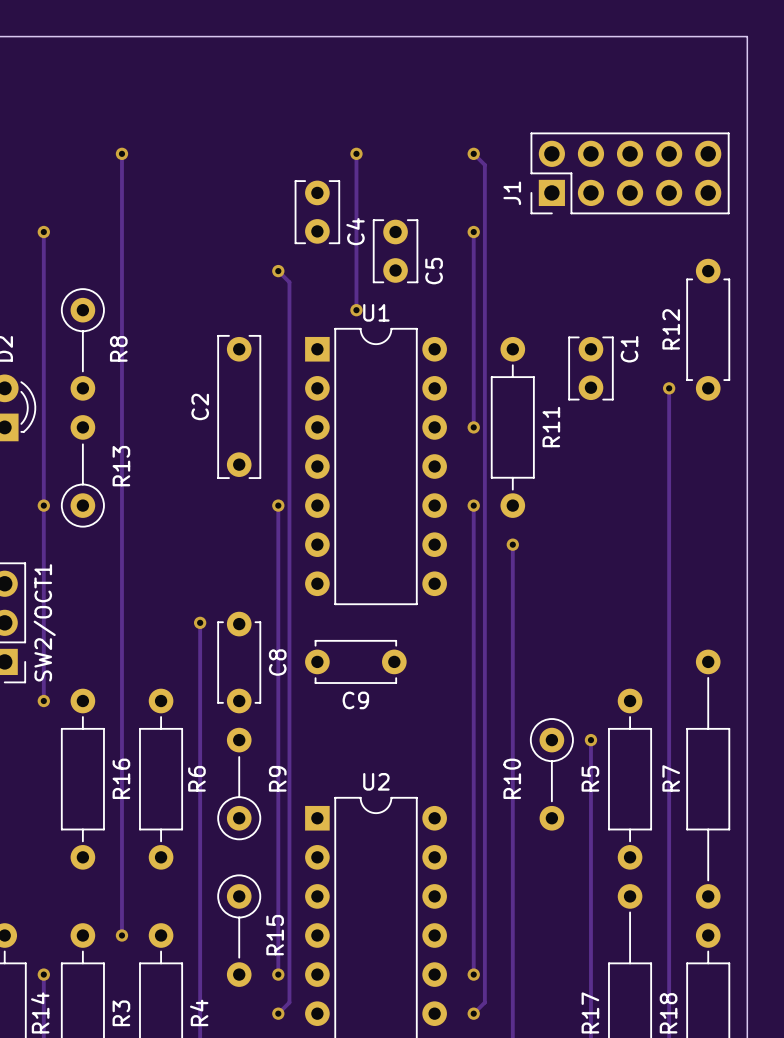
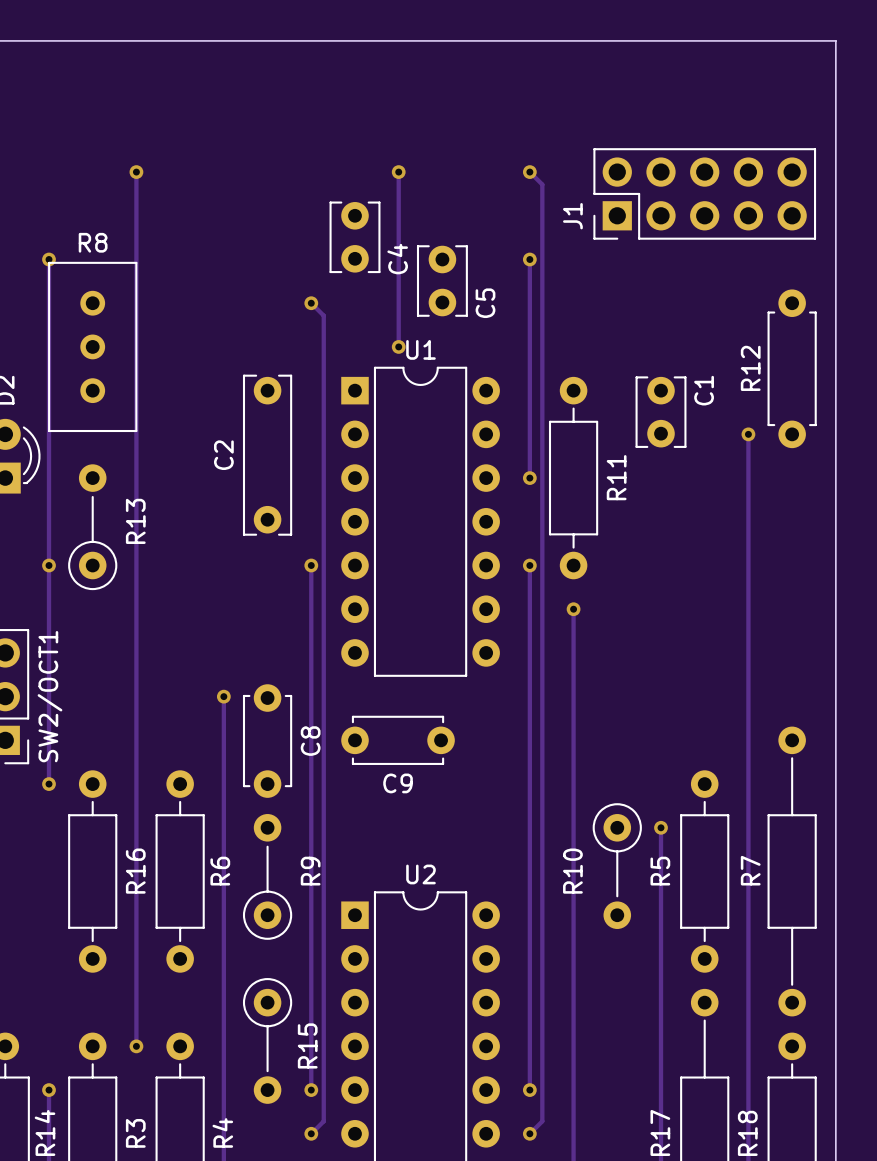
R8 footprint: [60, 288, 105, 401] -> [48, 261, 138, 433]
R8 name position: R8 (118, 348) -> R8 (93, 242)

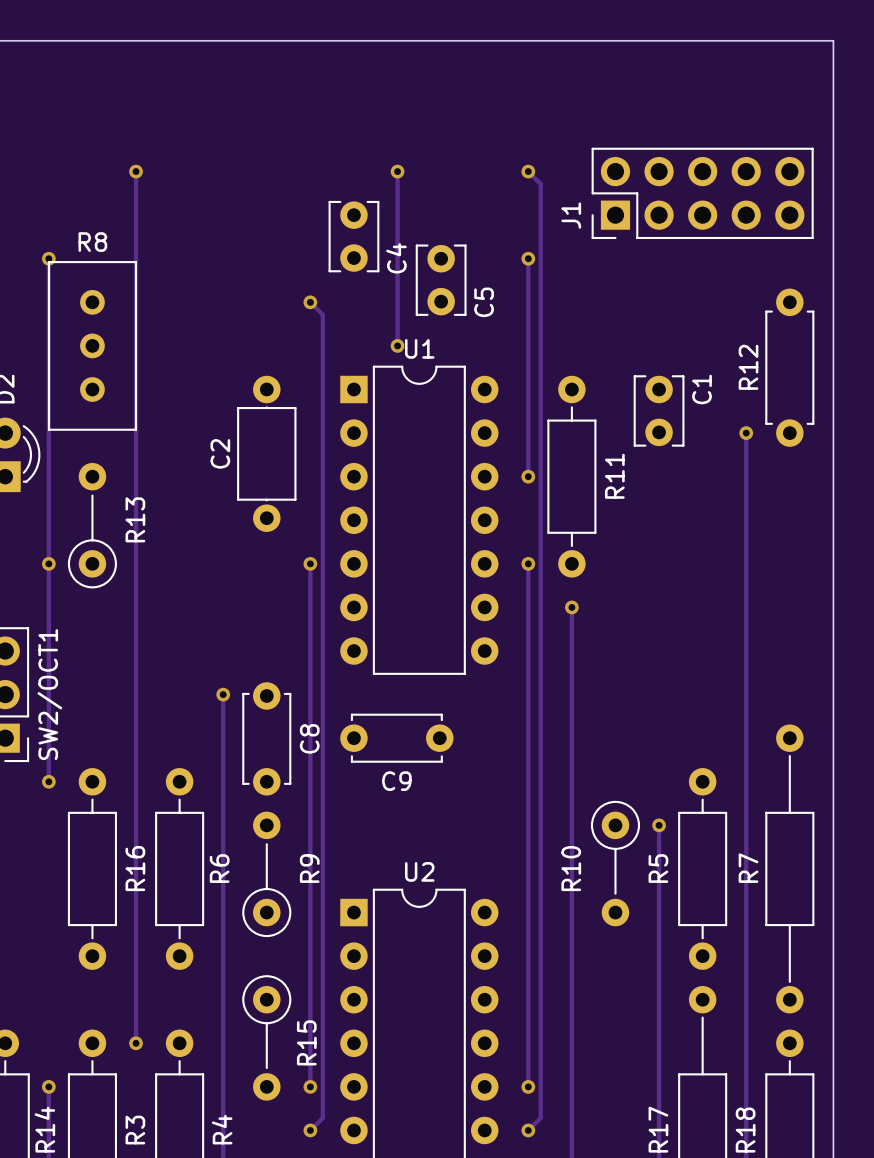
C2 footprint: [242, 374, 293, 536] -> [237, 375, 297, 532]

